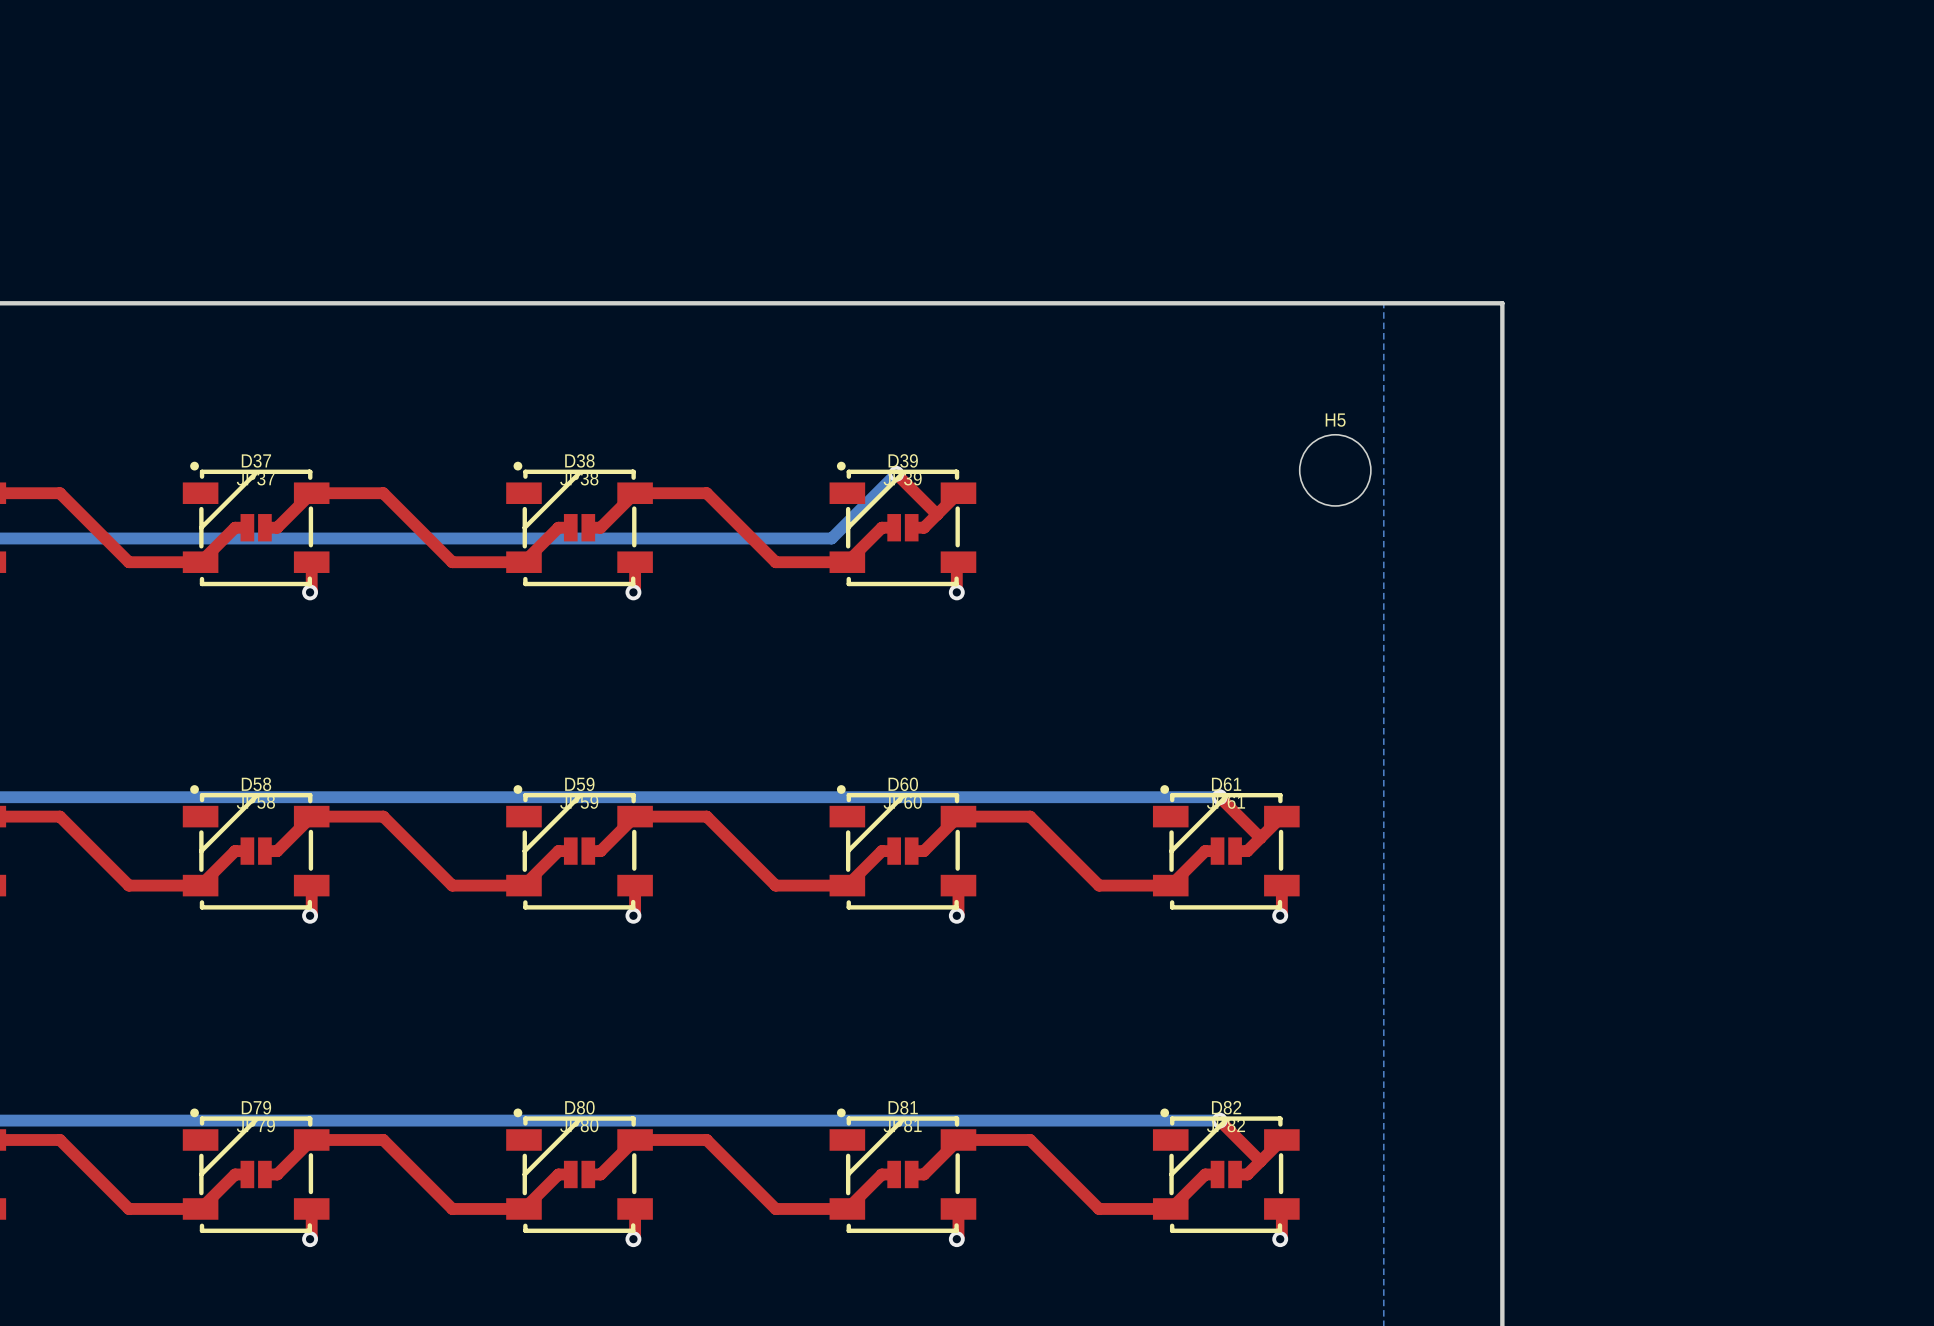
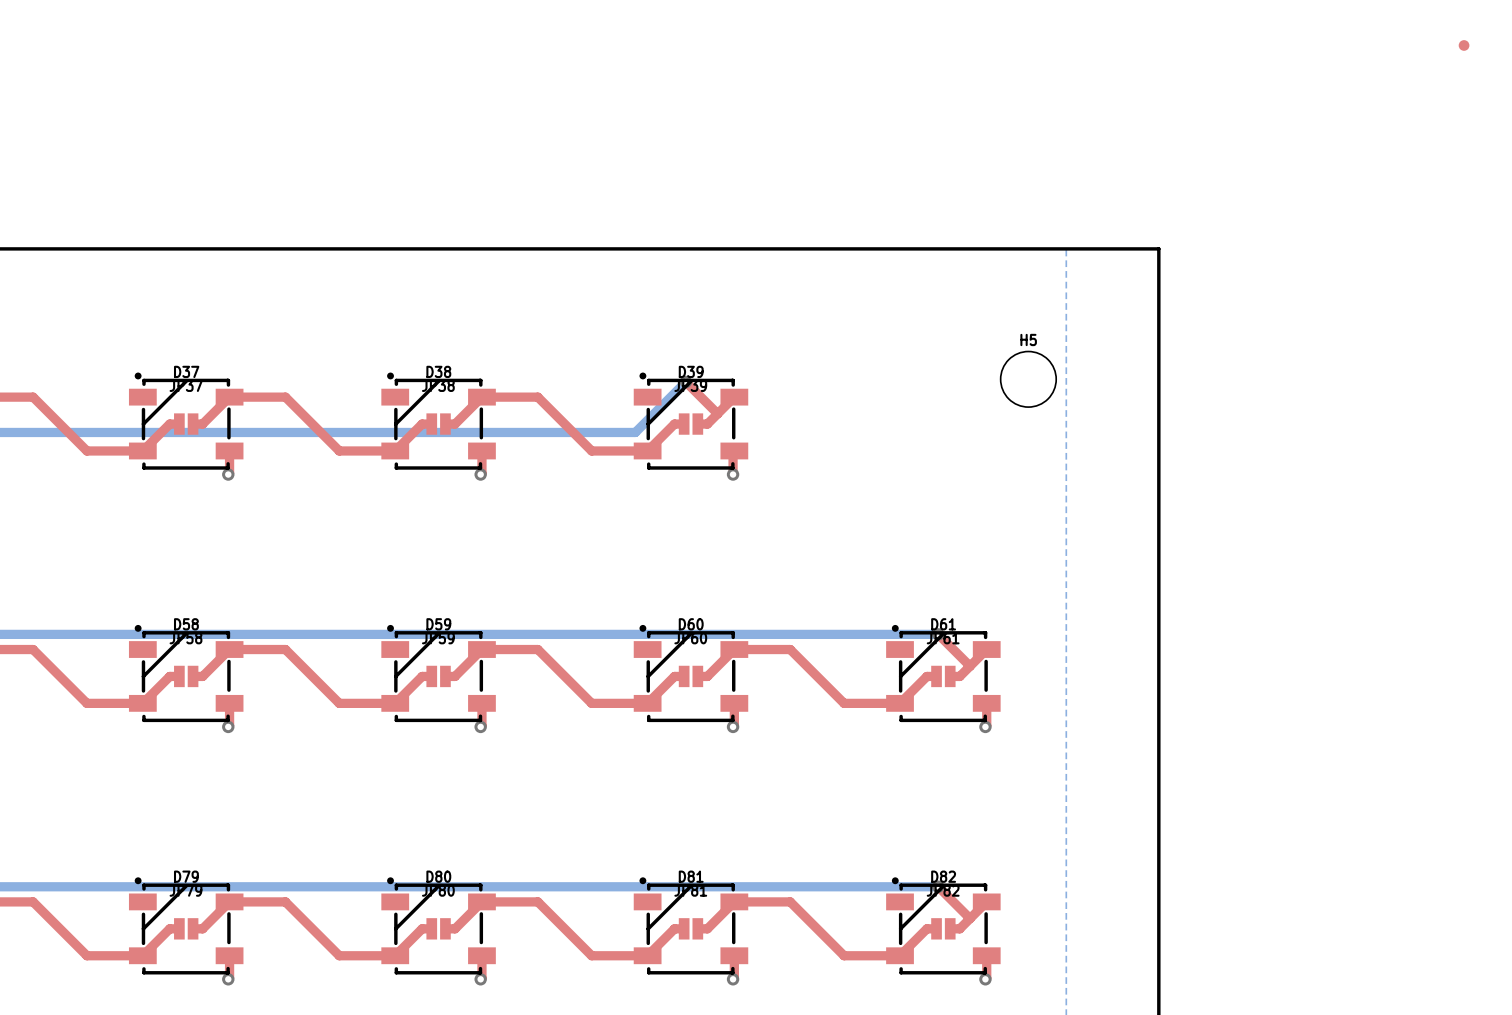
part: none -> (1464, 45)

